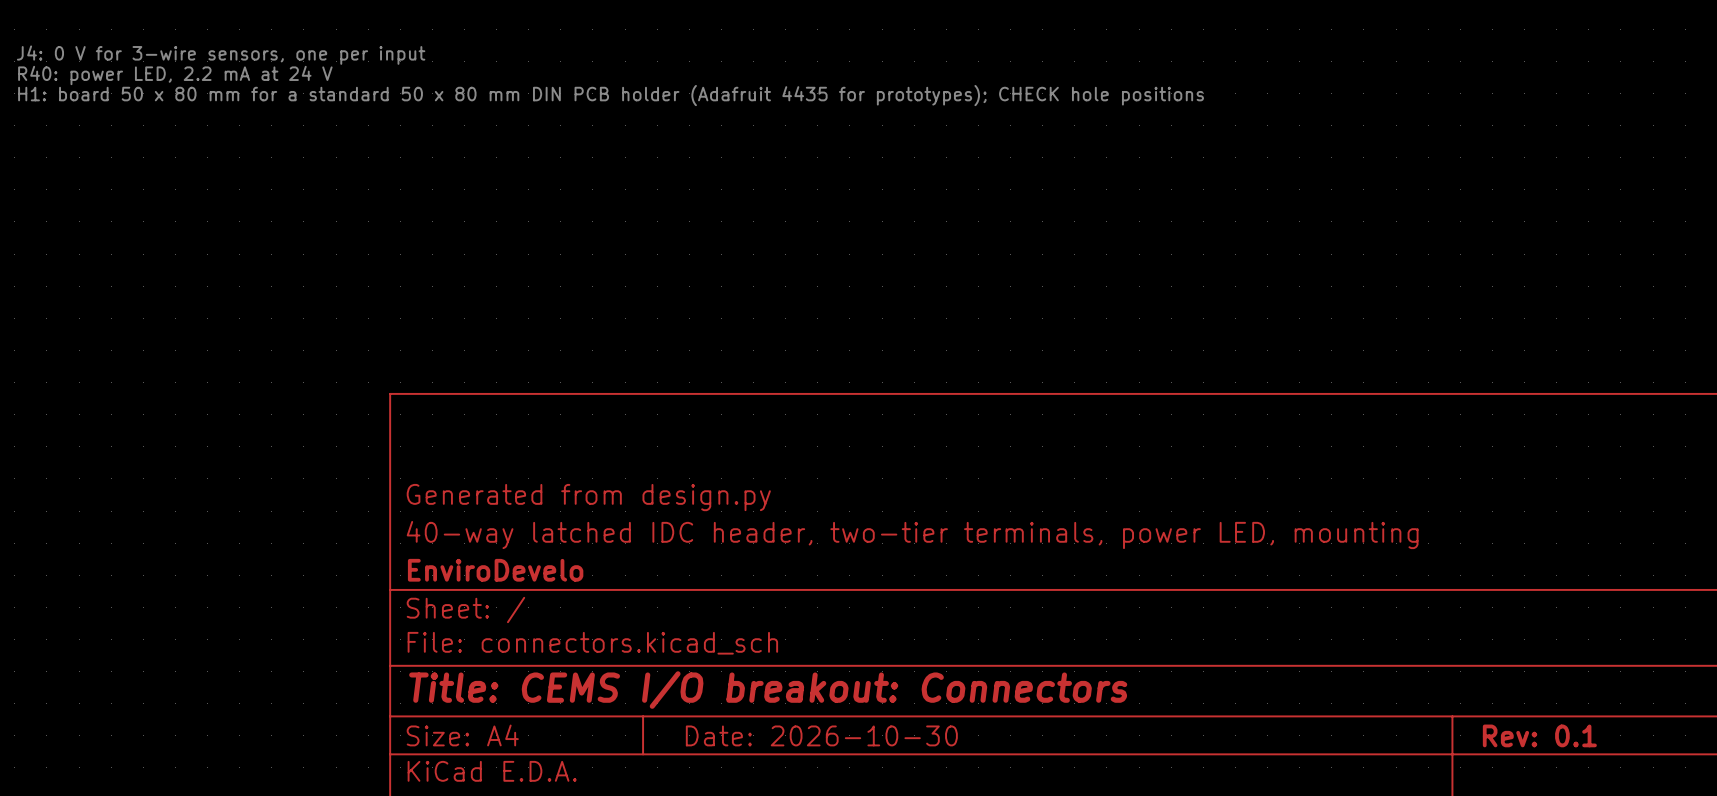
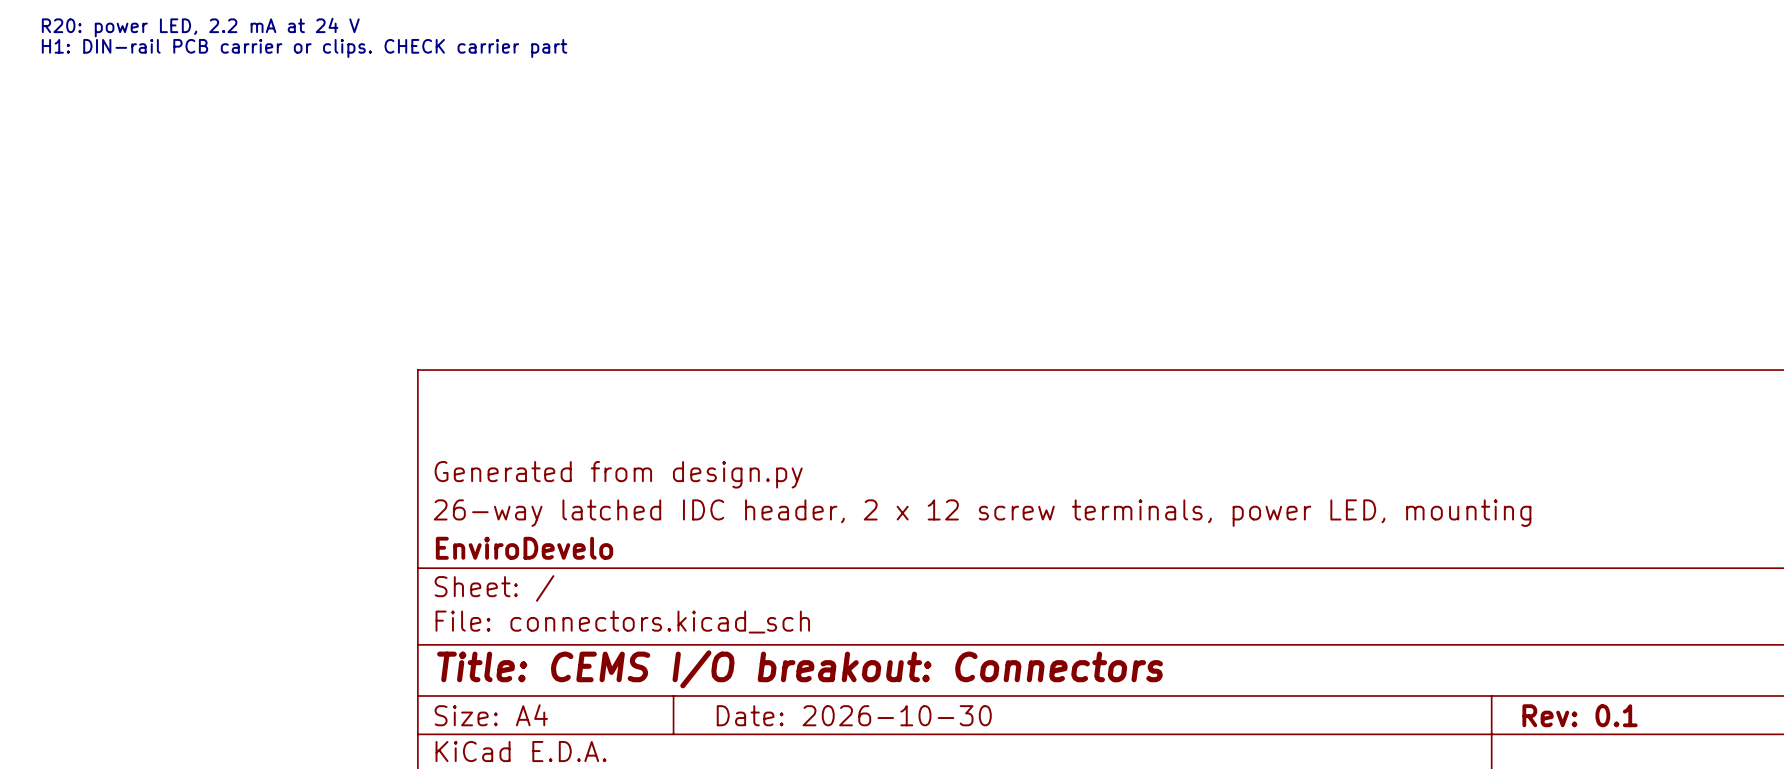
text: J4: 0 V for 3-wire sensors, one per input (221, 55) -> R20: power LED, 2.2 mA at 24 V (200, 27)
text: R40: power LED, 2.2 mA at 24 V (175, 75) -> H1: DIN-rail PCB carrier or clips. CHECK carrier part (304, 48)
text: H1: board 50 x 80 mm for a standard 50 x 80 mm DIN PCB holder (Adafruit 4435 for prototypes); CHECK hole positions (611, 95) -> none
title block: 40-way latched IDC header, two-tier terminals, power LED, mounting (912, 535) -> 26-way latched IDC header, 2 x 12 screw terminals, power LED, mounting (982, 513)

